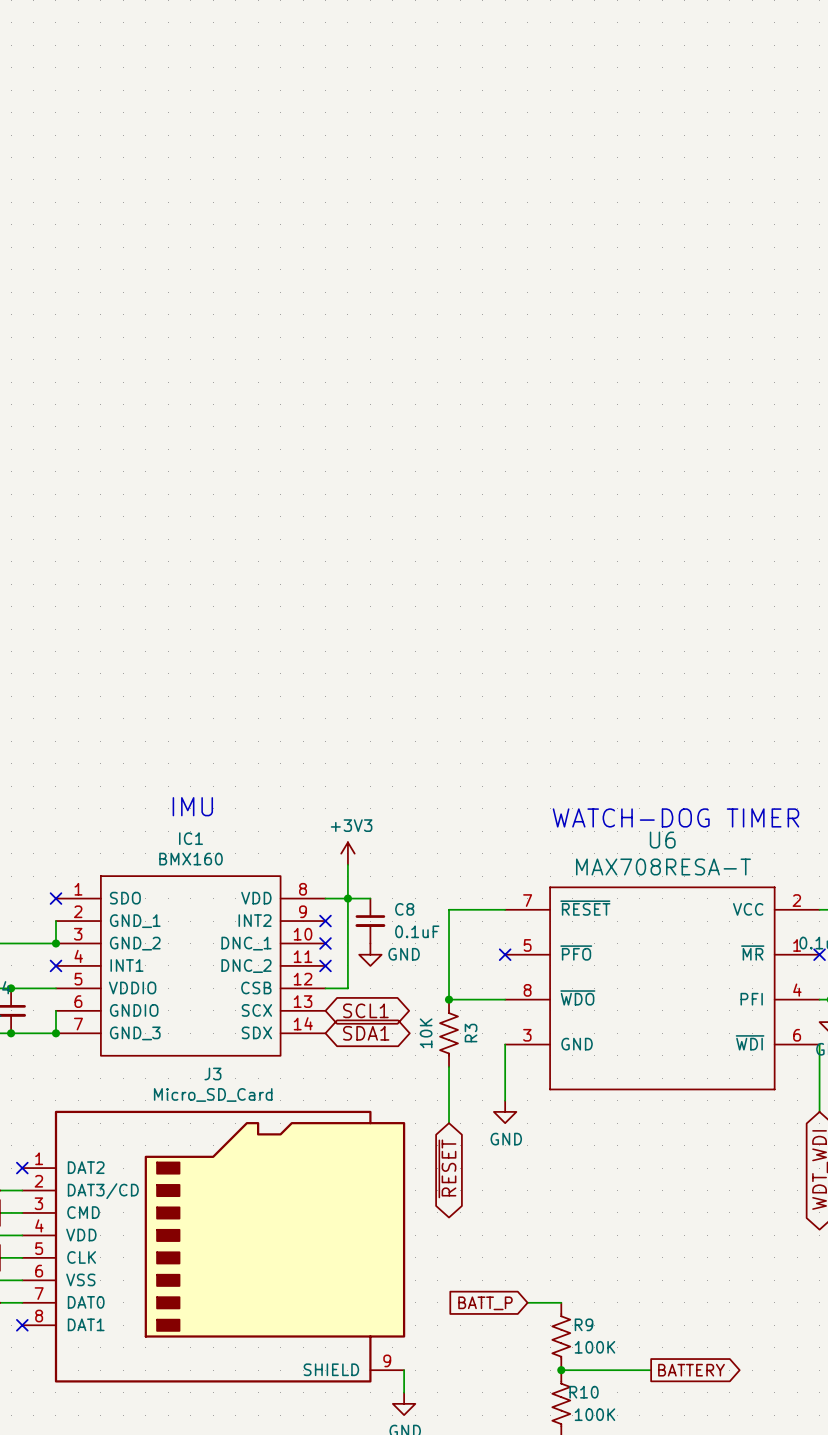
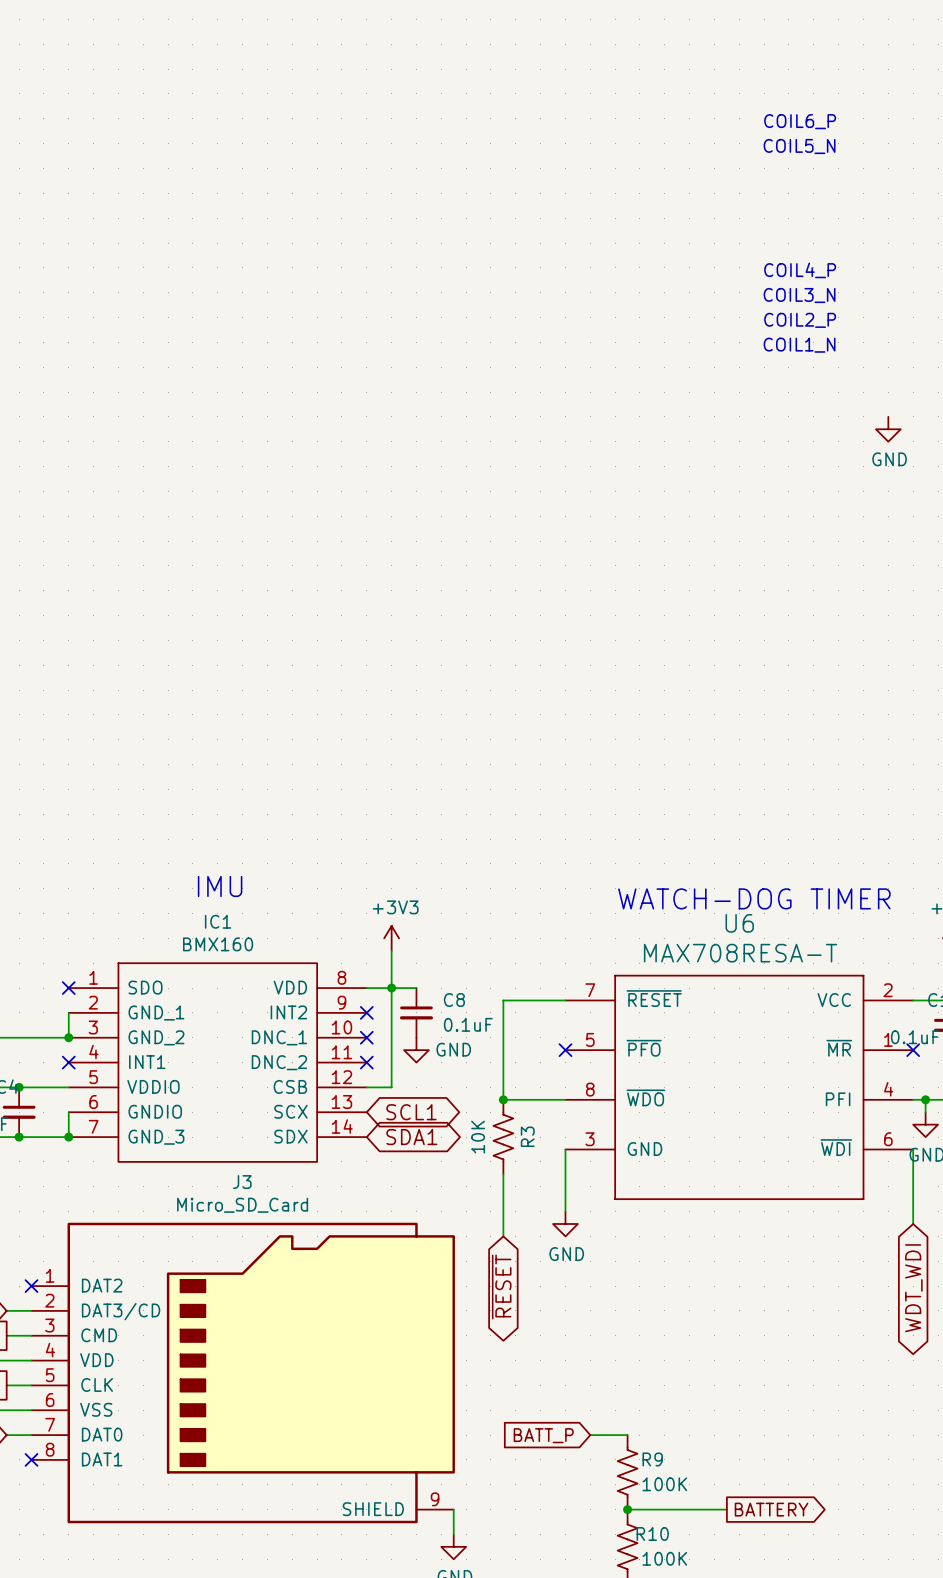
text: none -> COIL6_P (800, 121)
text: none -> COIL5_N (799, 146)
text: none -> COIL4_P (800, 270)
text: none -> COIL3_N (799, 295)
text: none -> COIL2_P (800, 320)
text: none -> COIL1_N (799, 345)
power symbol: none -> GND (888, 429)

